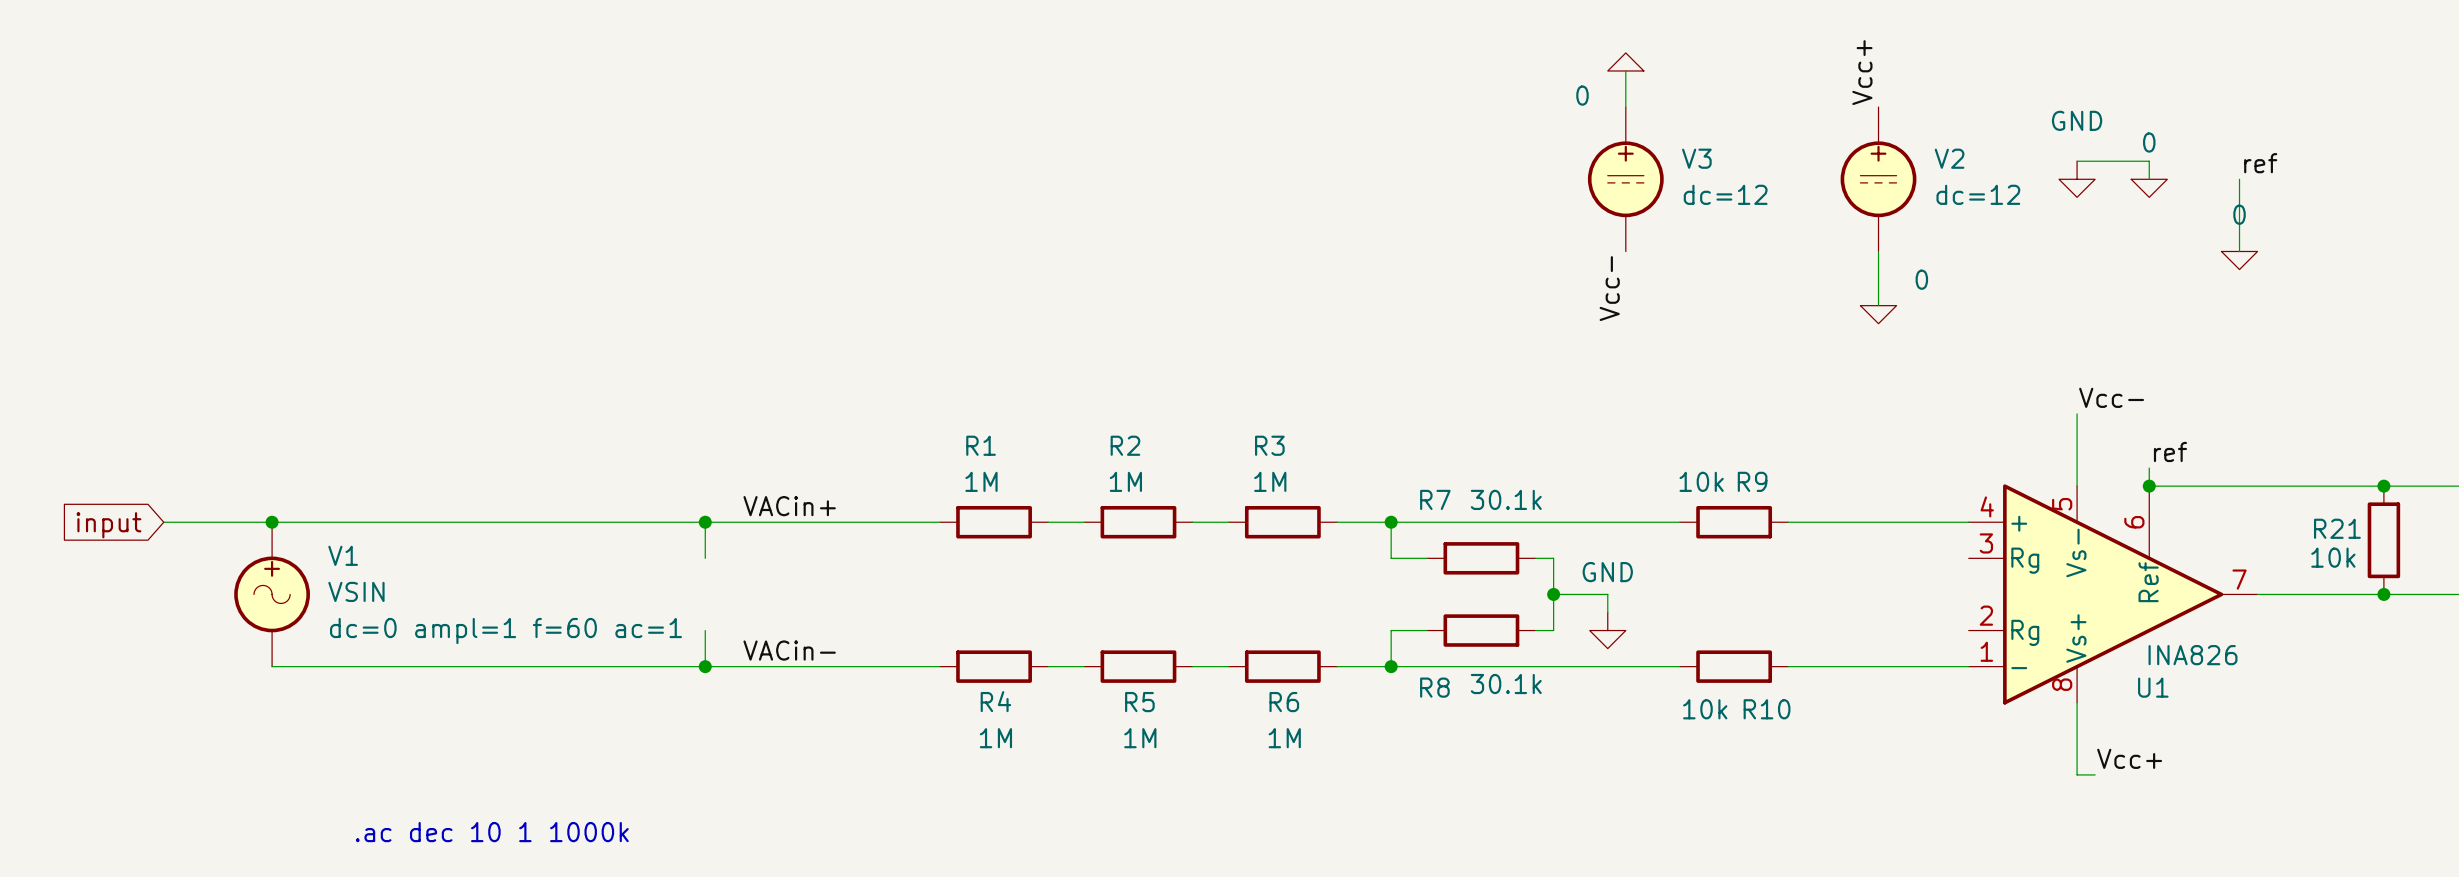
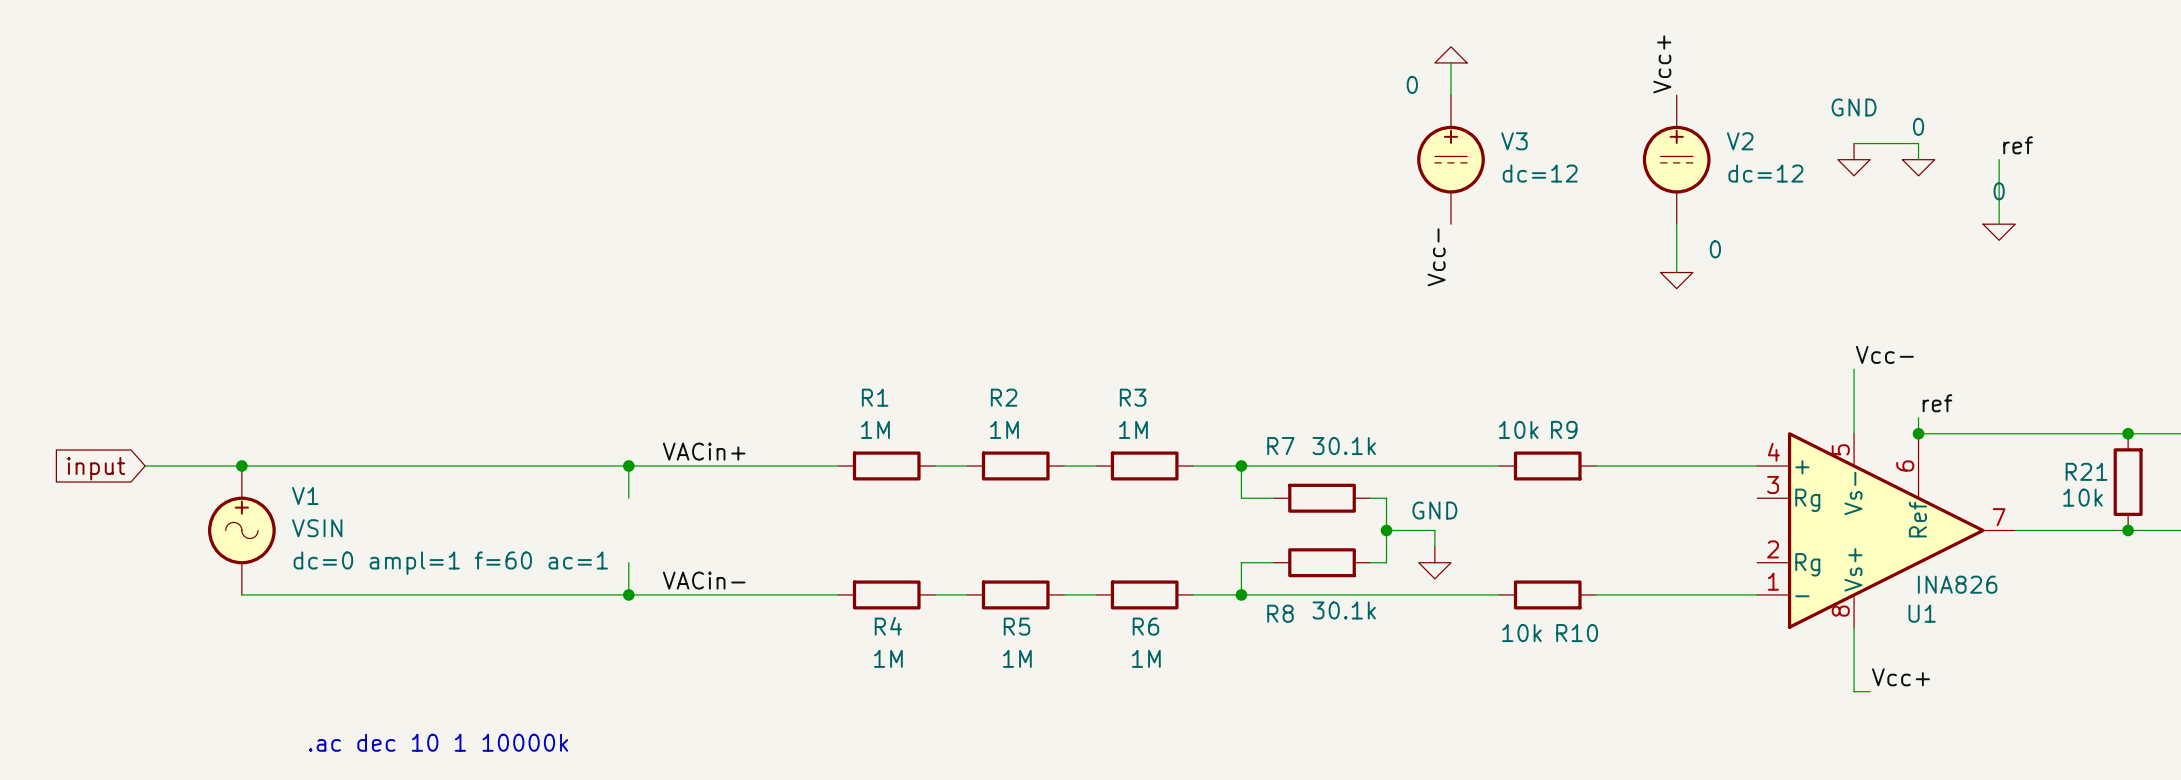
text: .ac dec 10 1 1000k (492, 832) -> .ac dec 10 1 10000k (438, 742)

